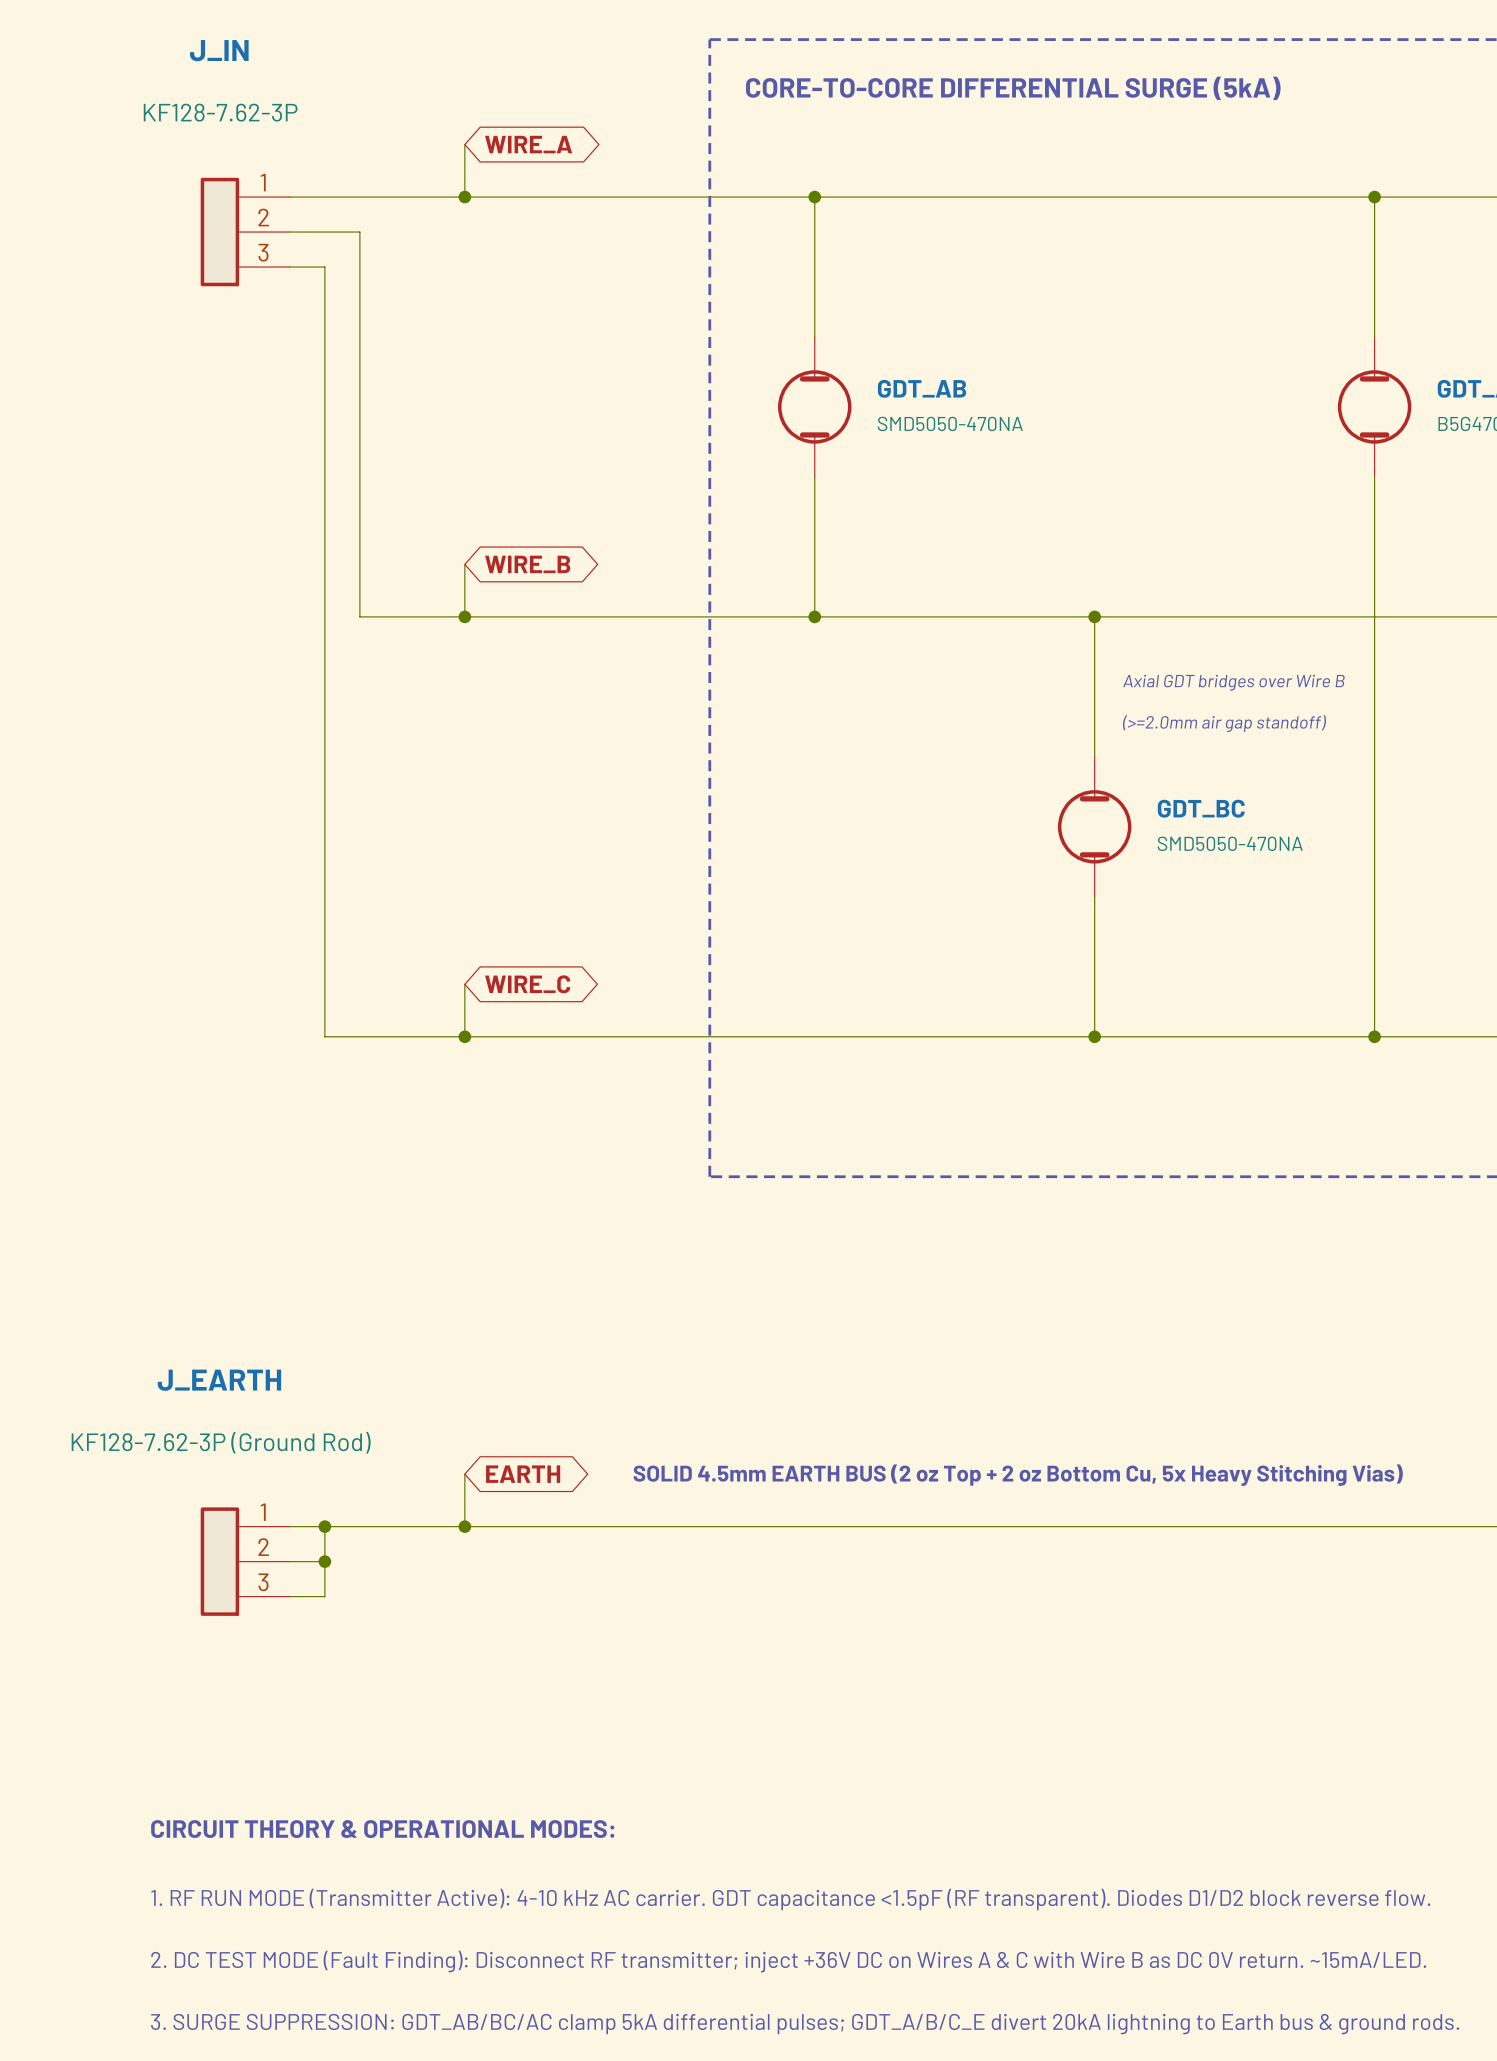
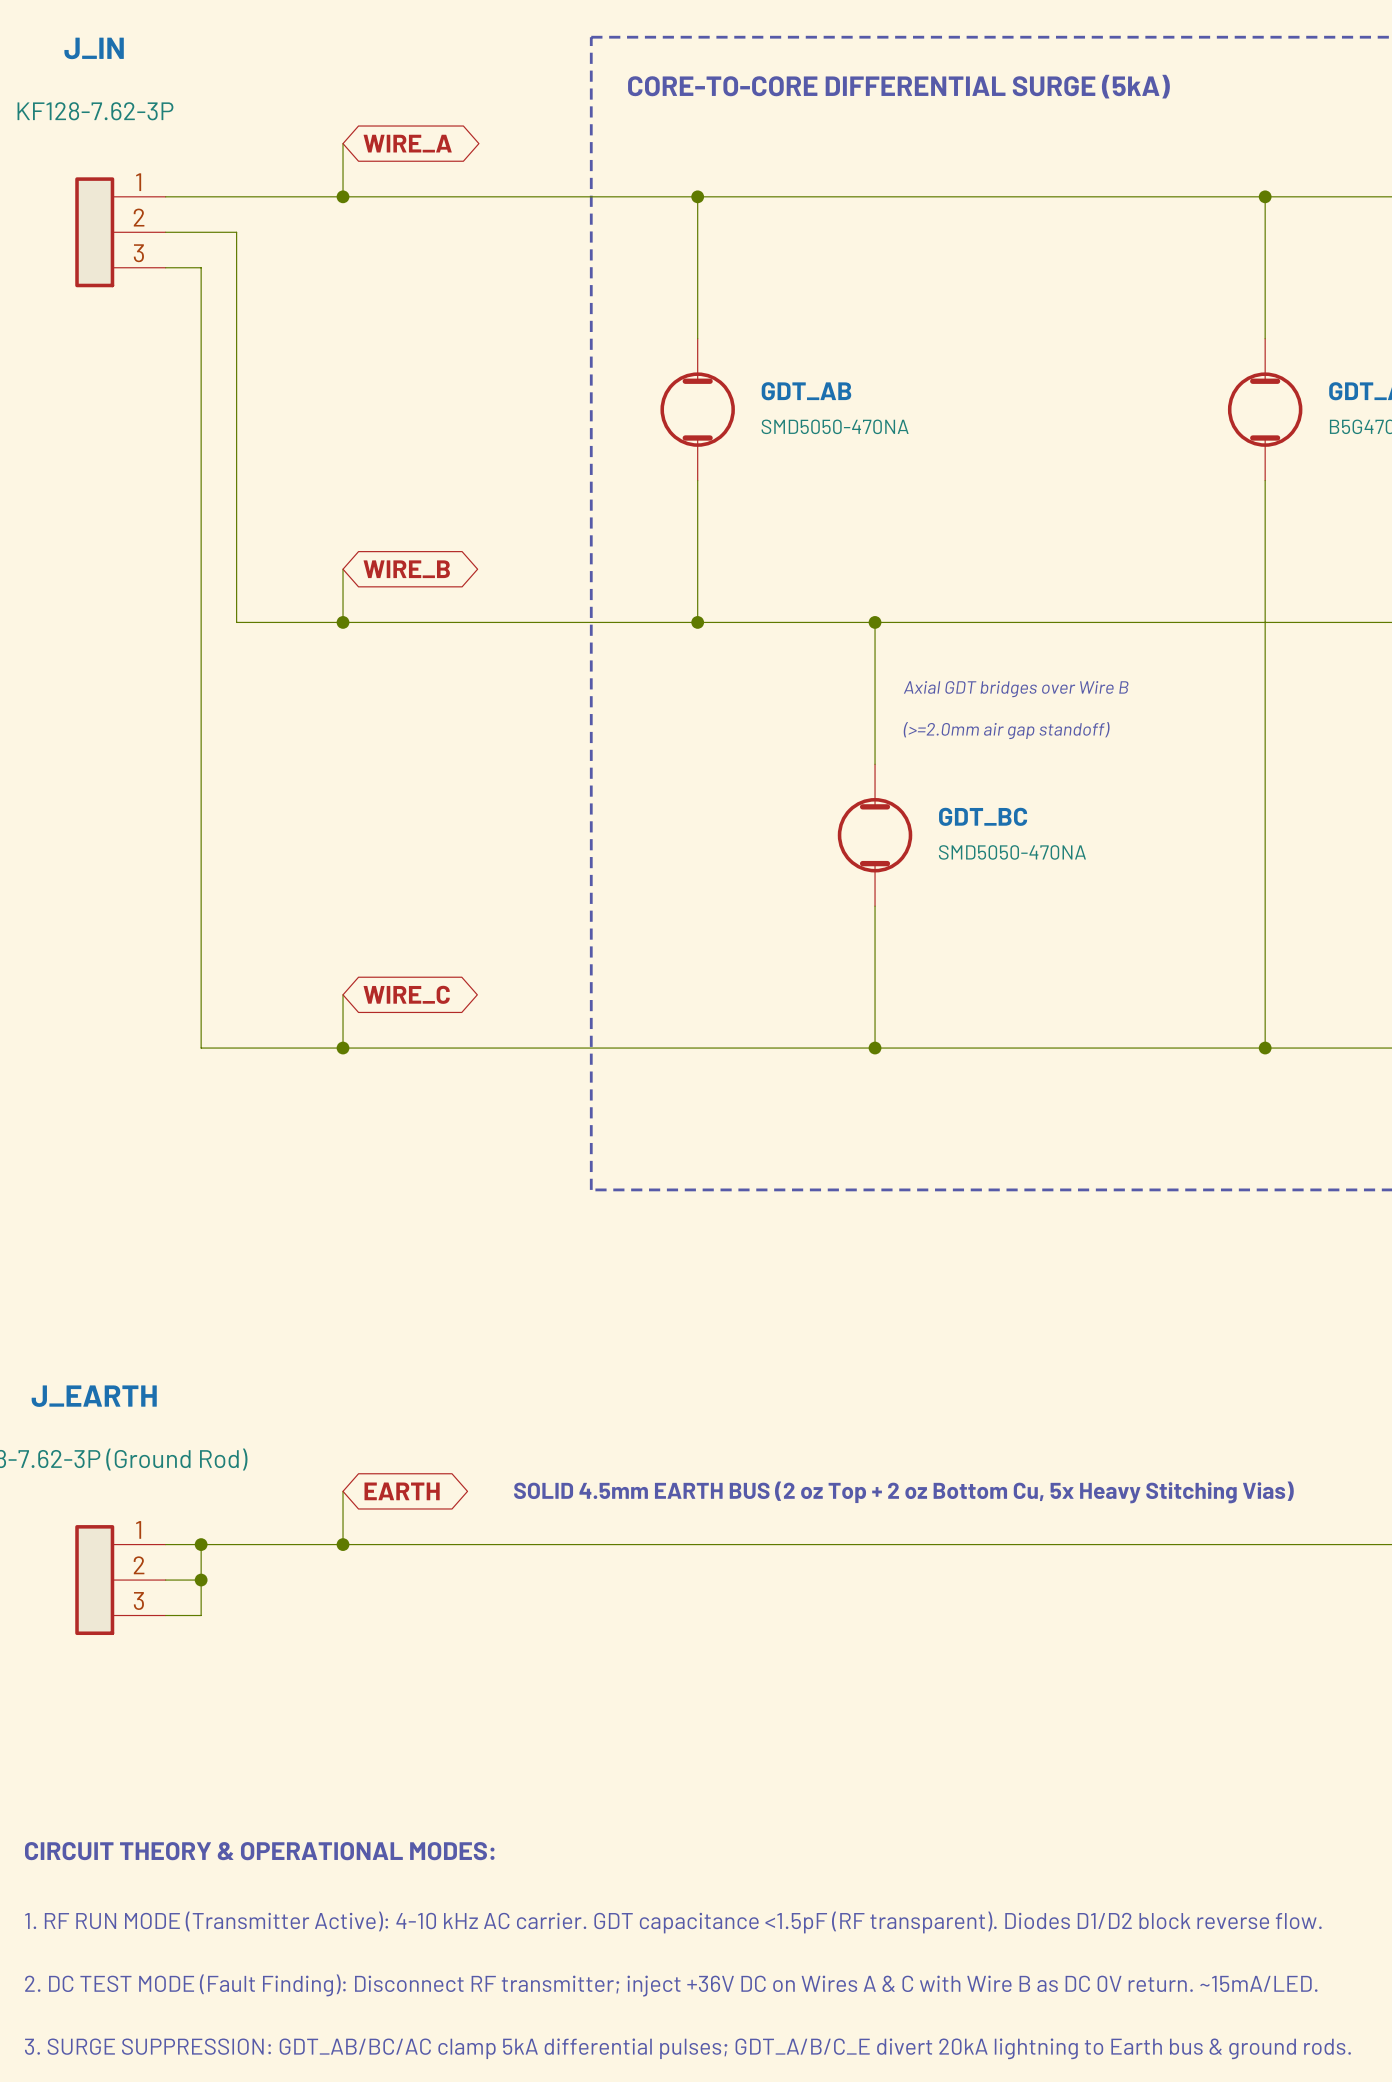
junction: none -> (875, 622)
wire: (1094, 616) (1094, 756) -> (875, 622) (875, 764)
junction: (1094, 616) -> none
text position: Axial GDT bridges over Wire B (1233, 682) -> Axial GDT bridges over Wire B (1016, 689)
text position: (>=2.0mm air gap standoff) (1224, 723) -> (>=2.0mm air gap standoff) (1006, 730)
GDT_BC position: (1094, 826) -> (875, 835)
wire: (1094, 896) (1094, 1036) -> (875, 906) (875, 1048)
junction: none -> (875, 1048)
junction: (1094, 1036) -> none

